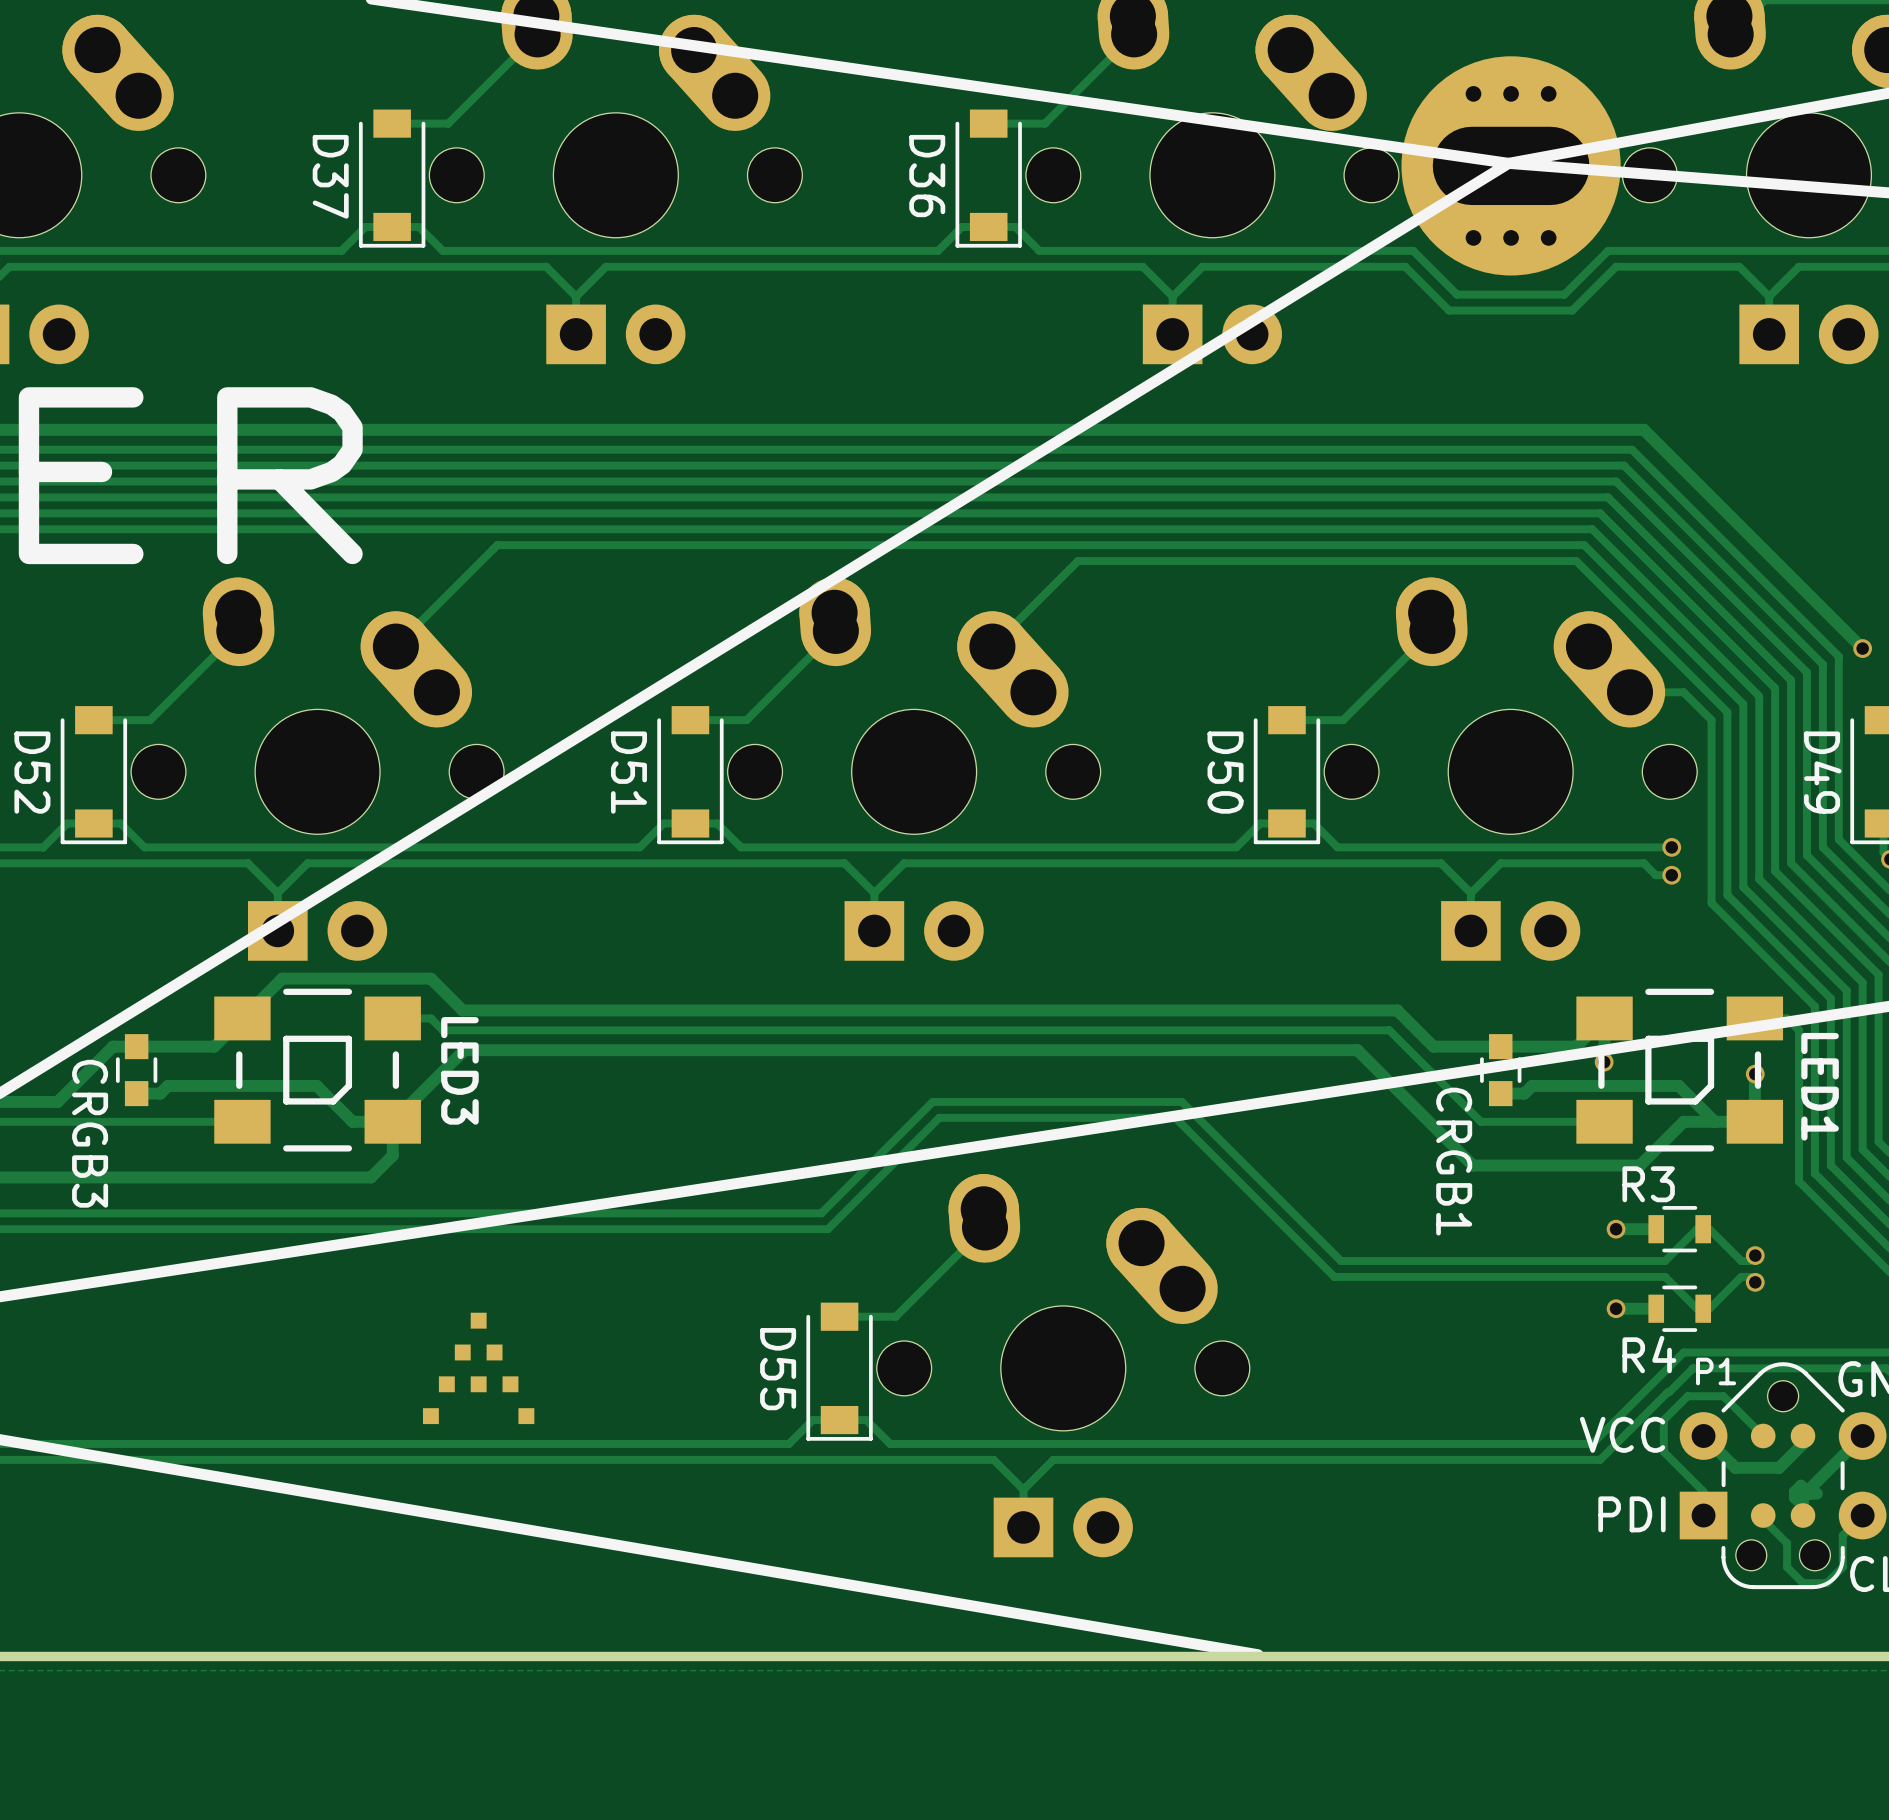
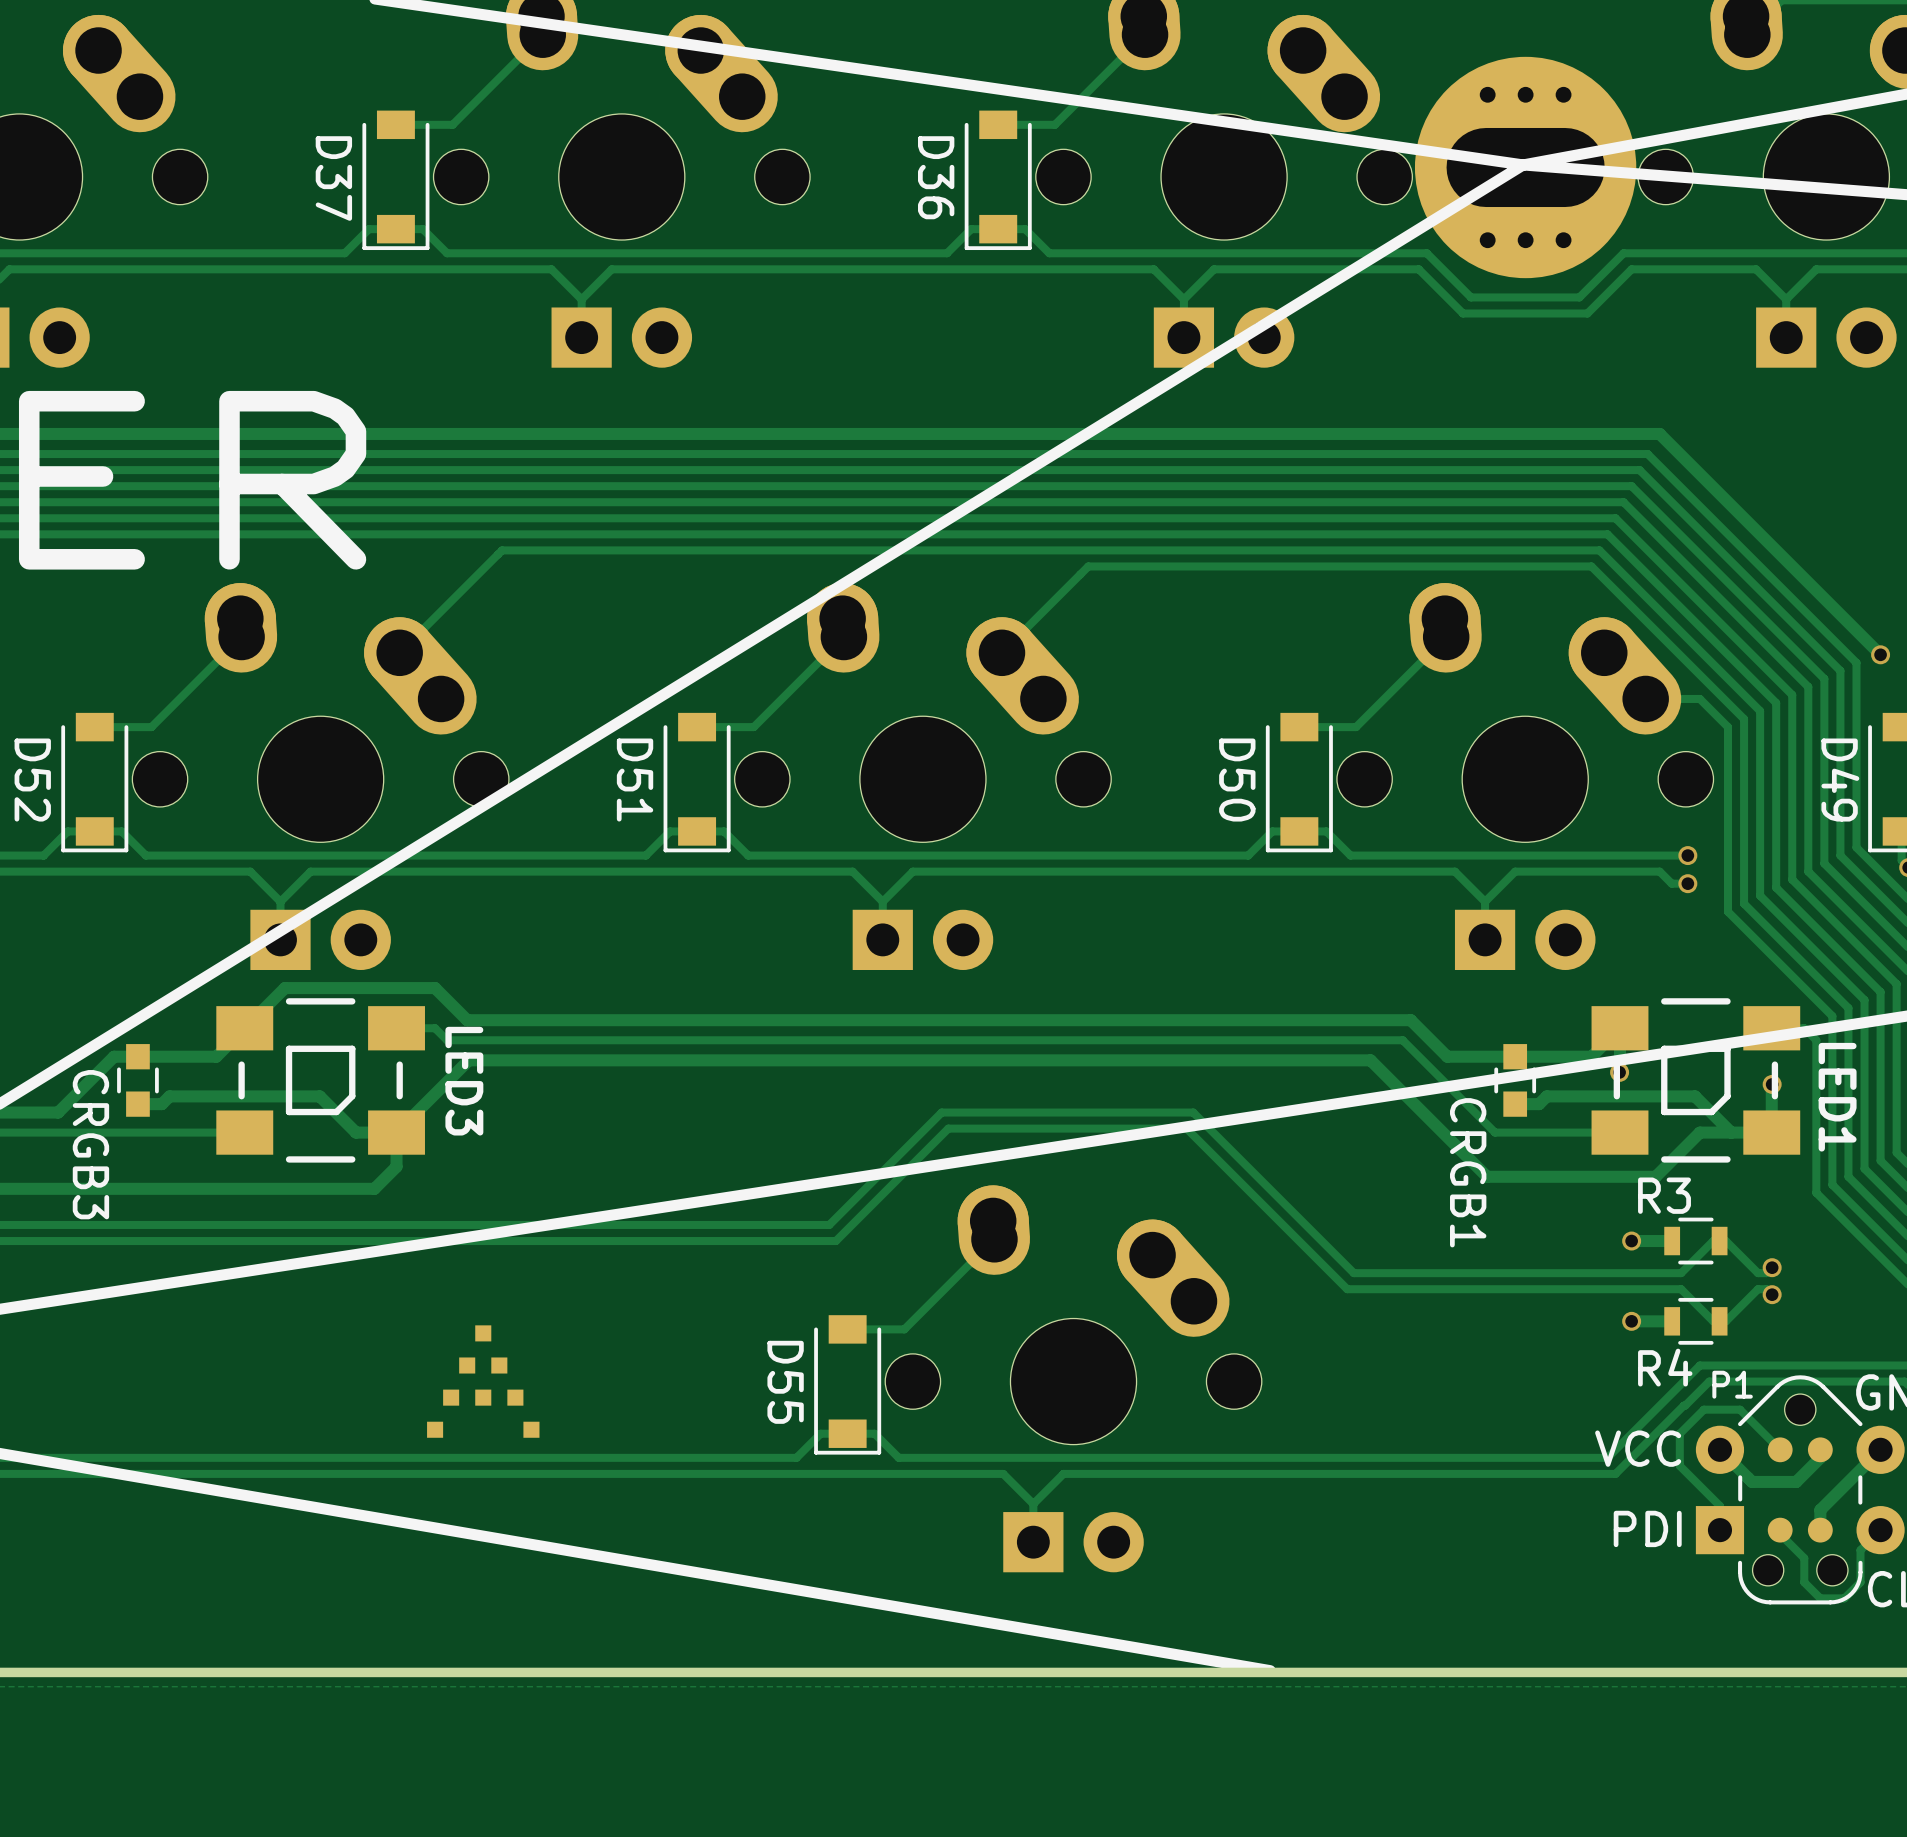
track: (1816, 1493) (1808, 1493) (1801, 1485) (1795, 1491) (1795, 1497) (1802, 1505) -> none

